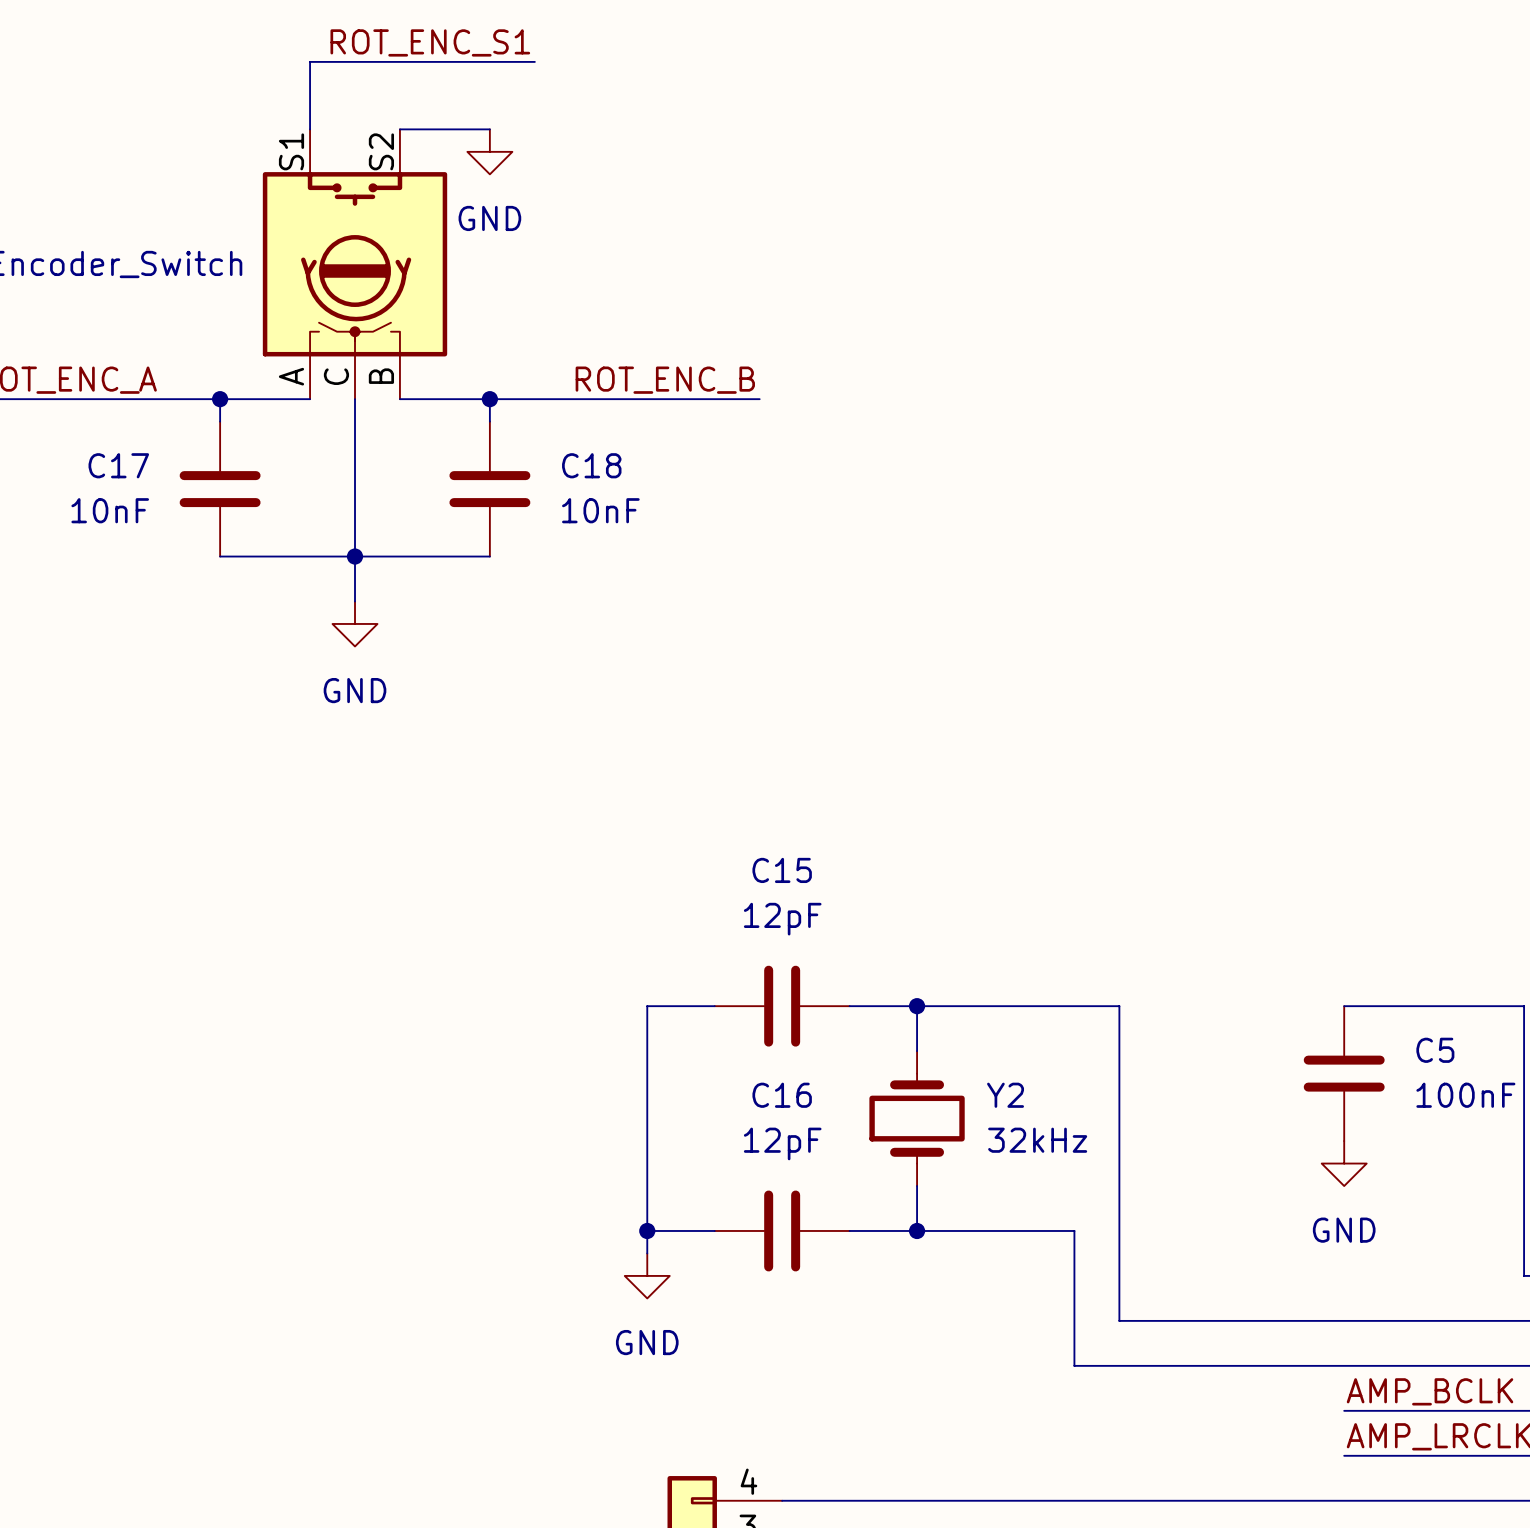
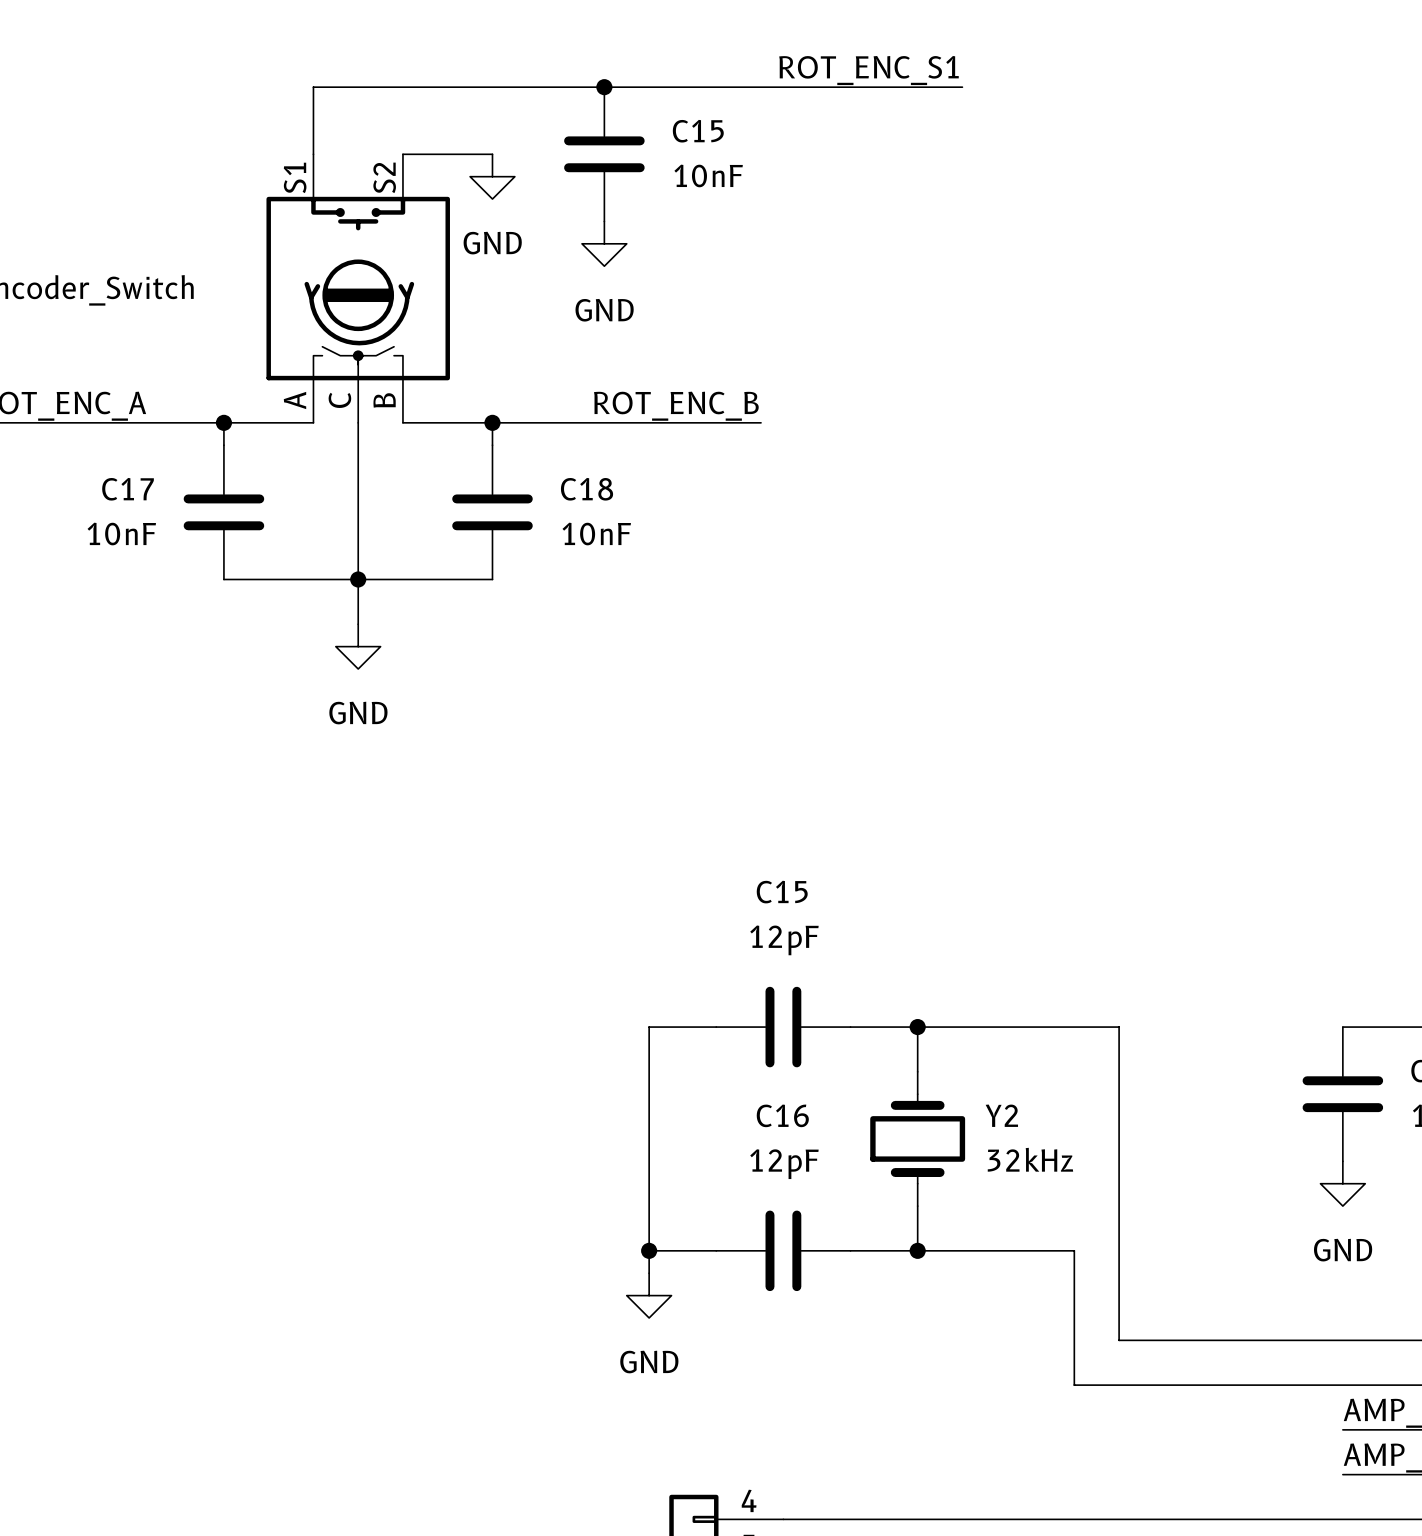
label position: ROT_ENC_S1 (430, 42) -> ROT_ENC_S1 (868, 70)
wire: none -> (537, 87) (962, 87)
junction: none -> (604, 87)
C15: none -> 10nF (604, 154)
power symbol: none -> GND (604, 243)

